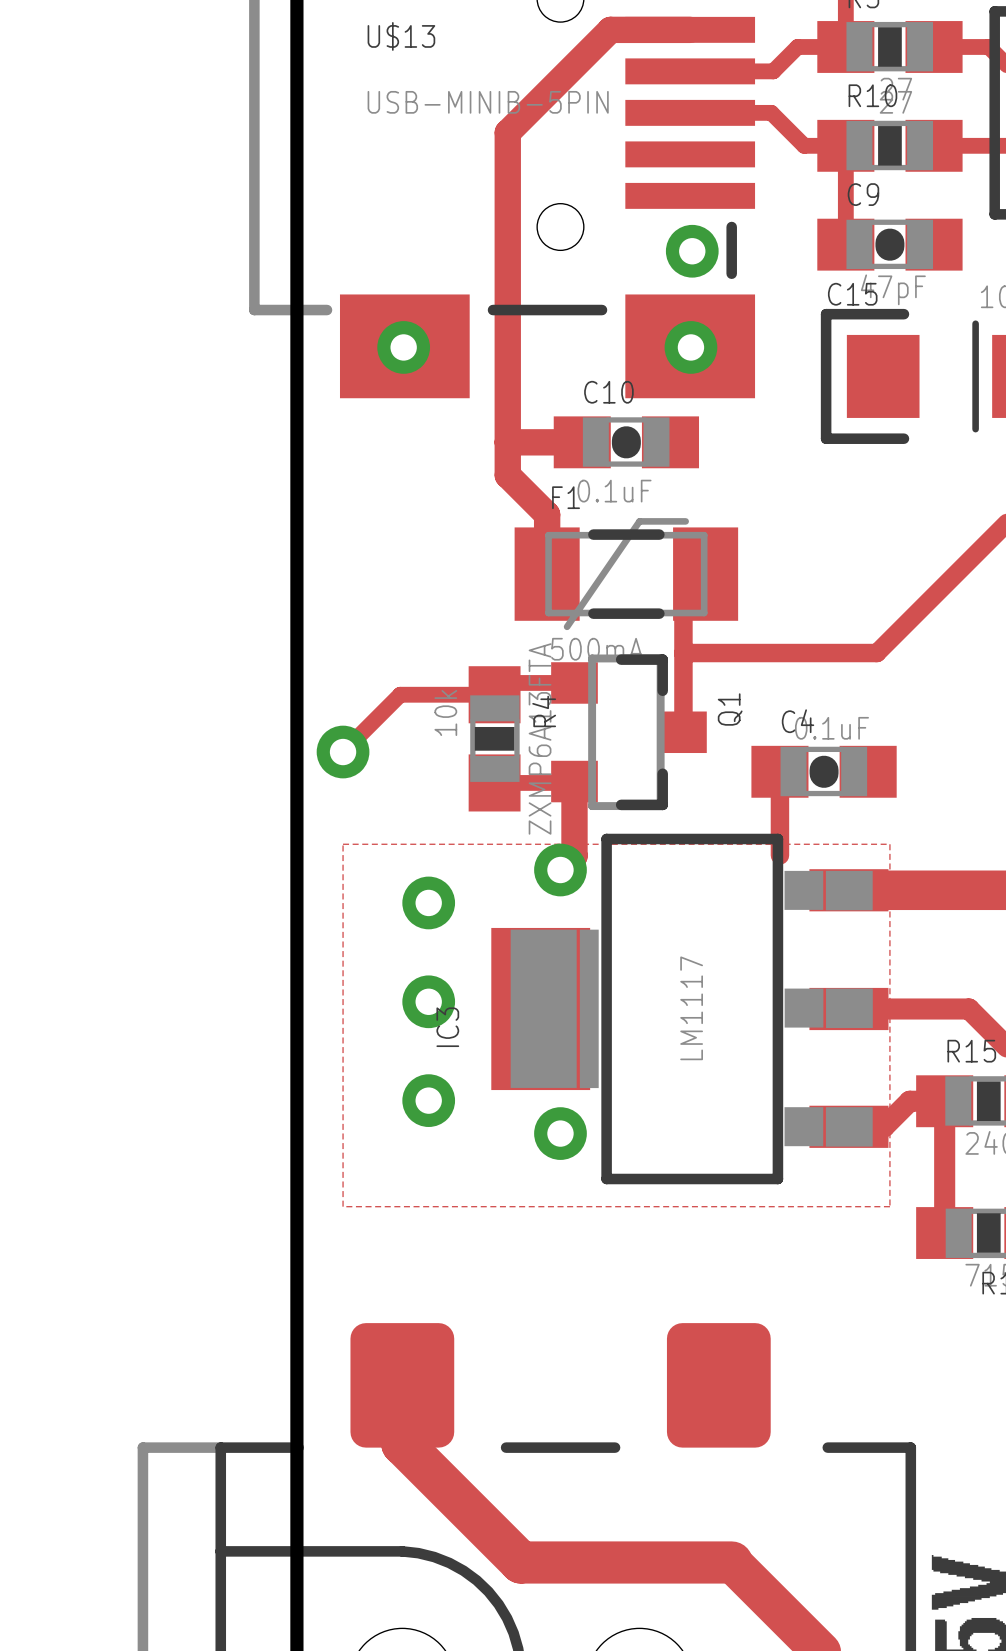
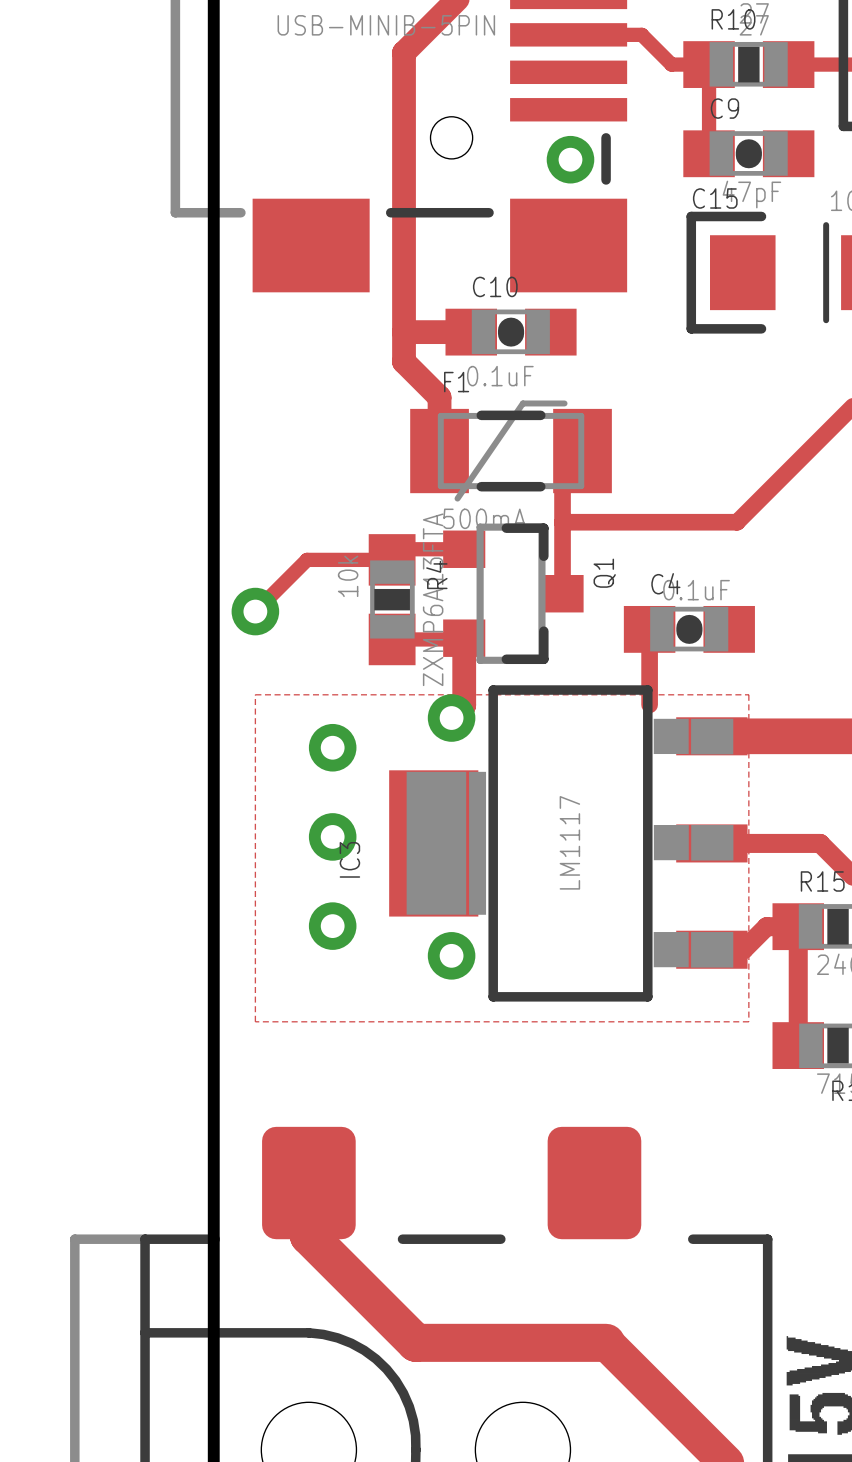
via: (403, 347) -> none
via: (690, 347) -> none

